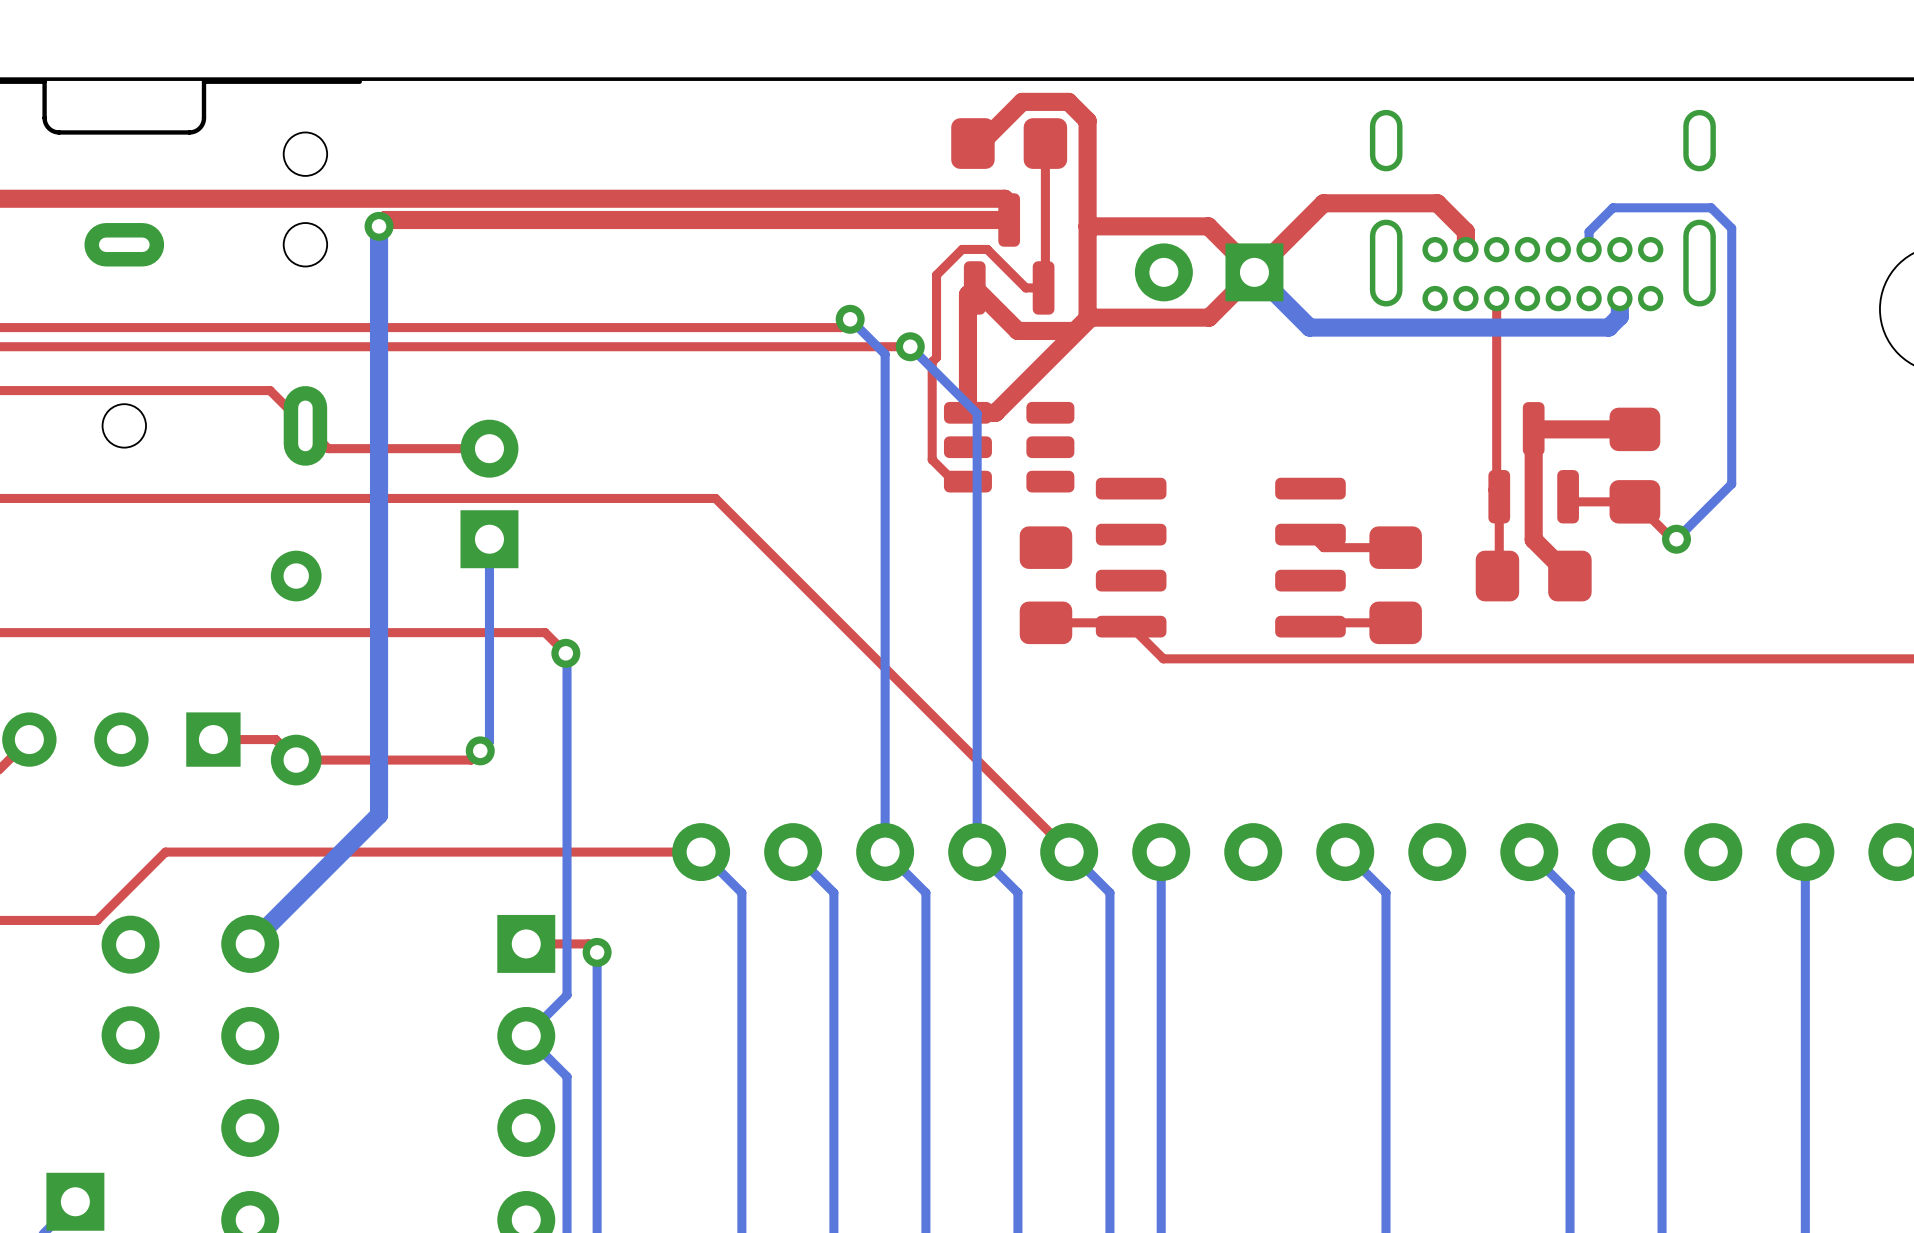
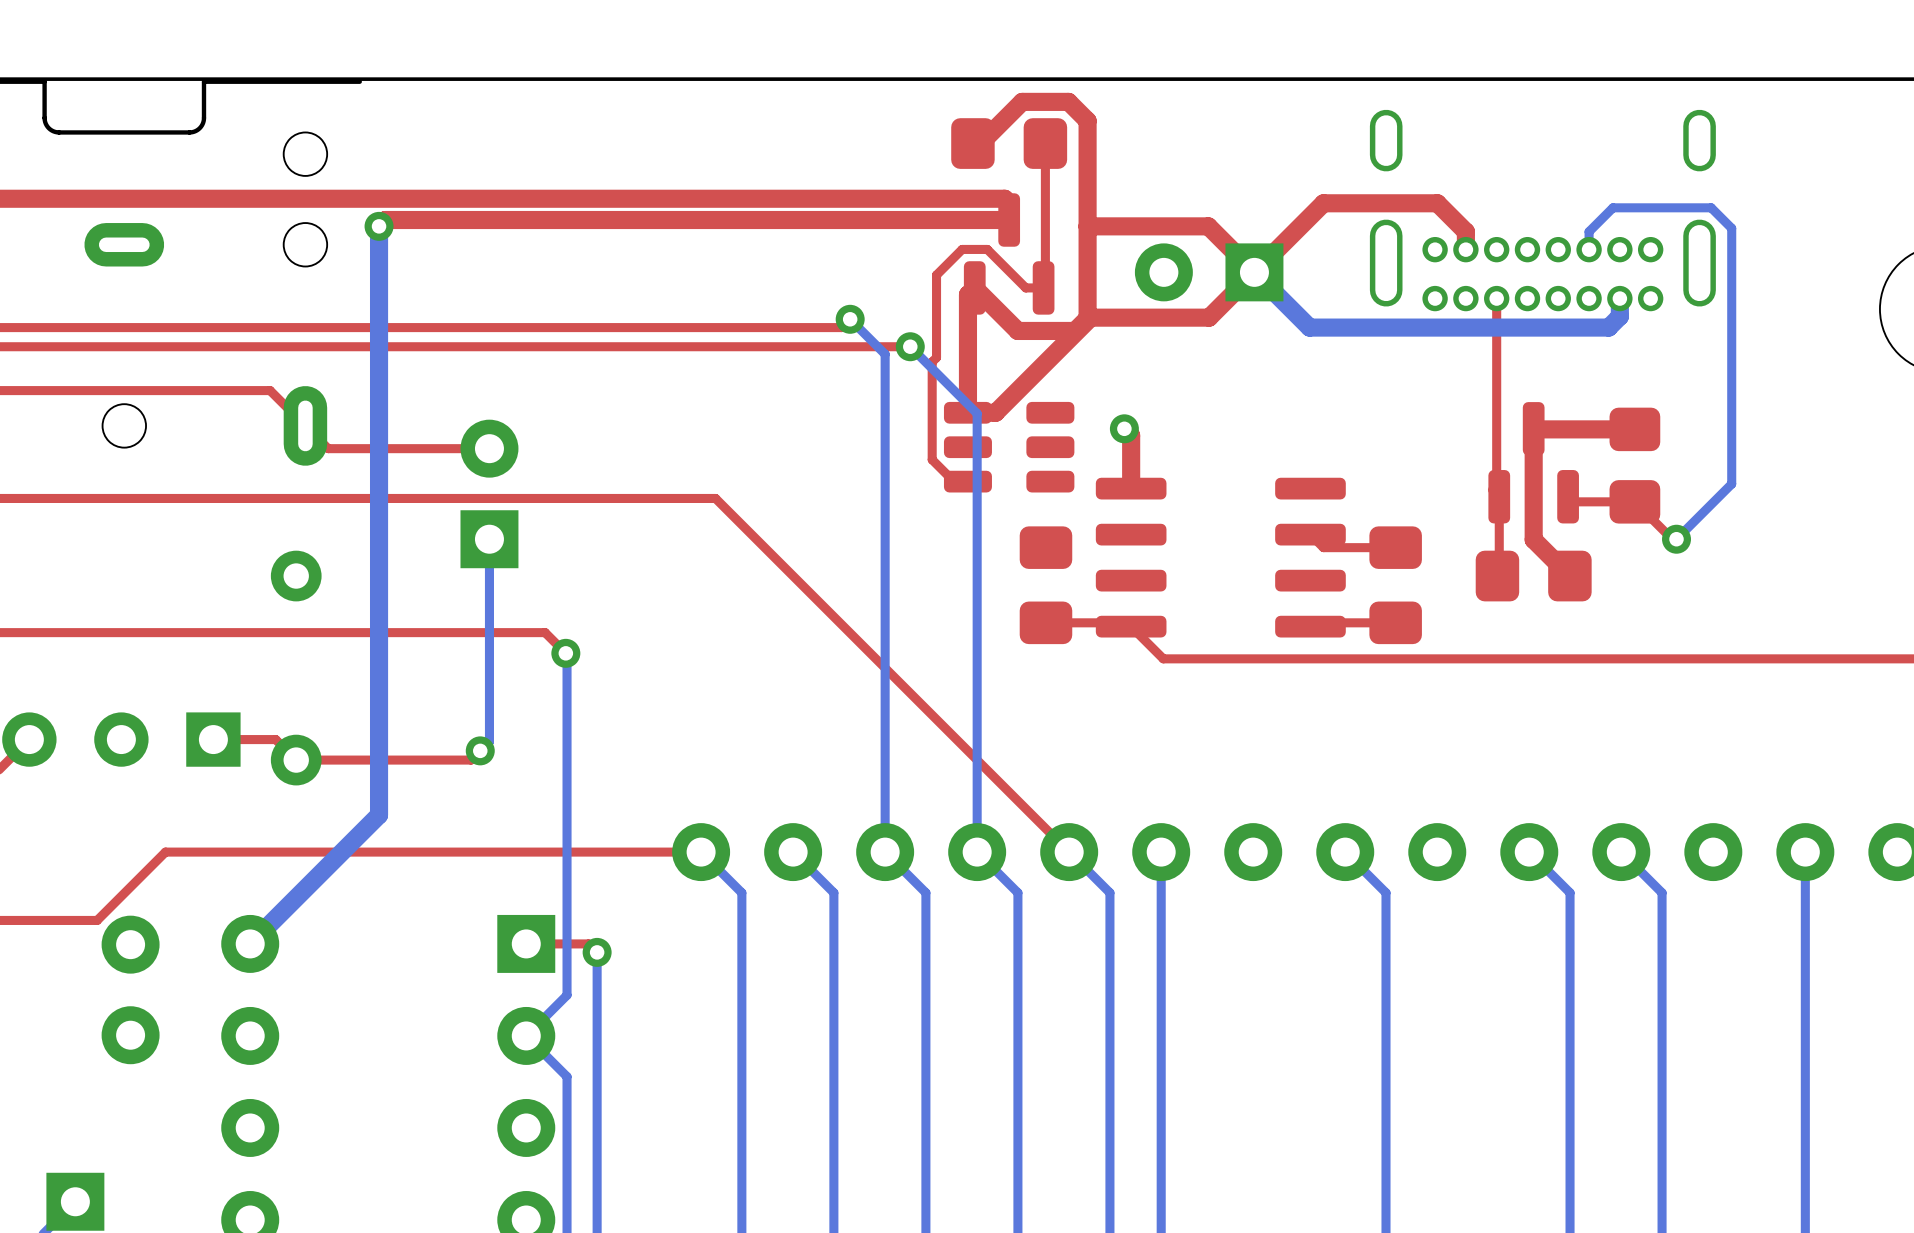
top track: none -> (1124, 428) (1131, 435) (1131, 488)
via: none -> (1124, 428)

